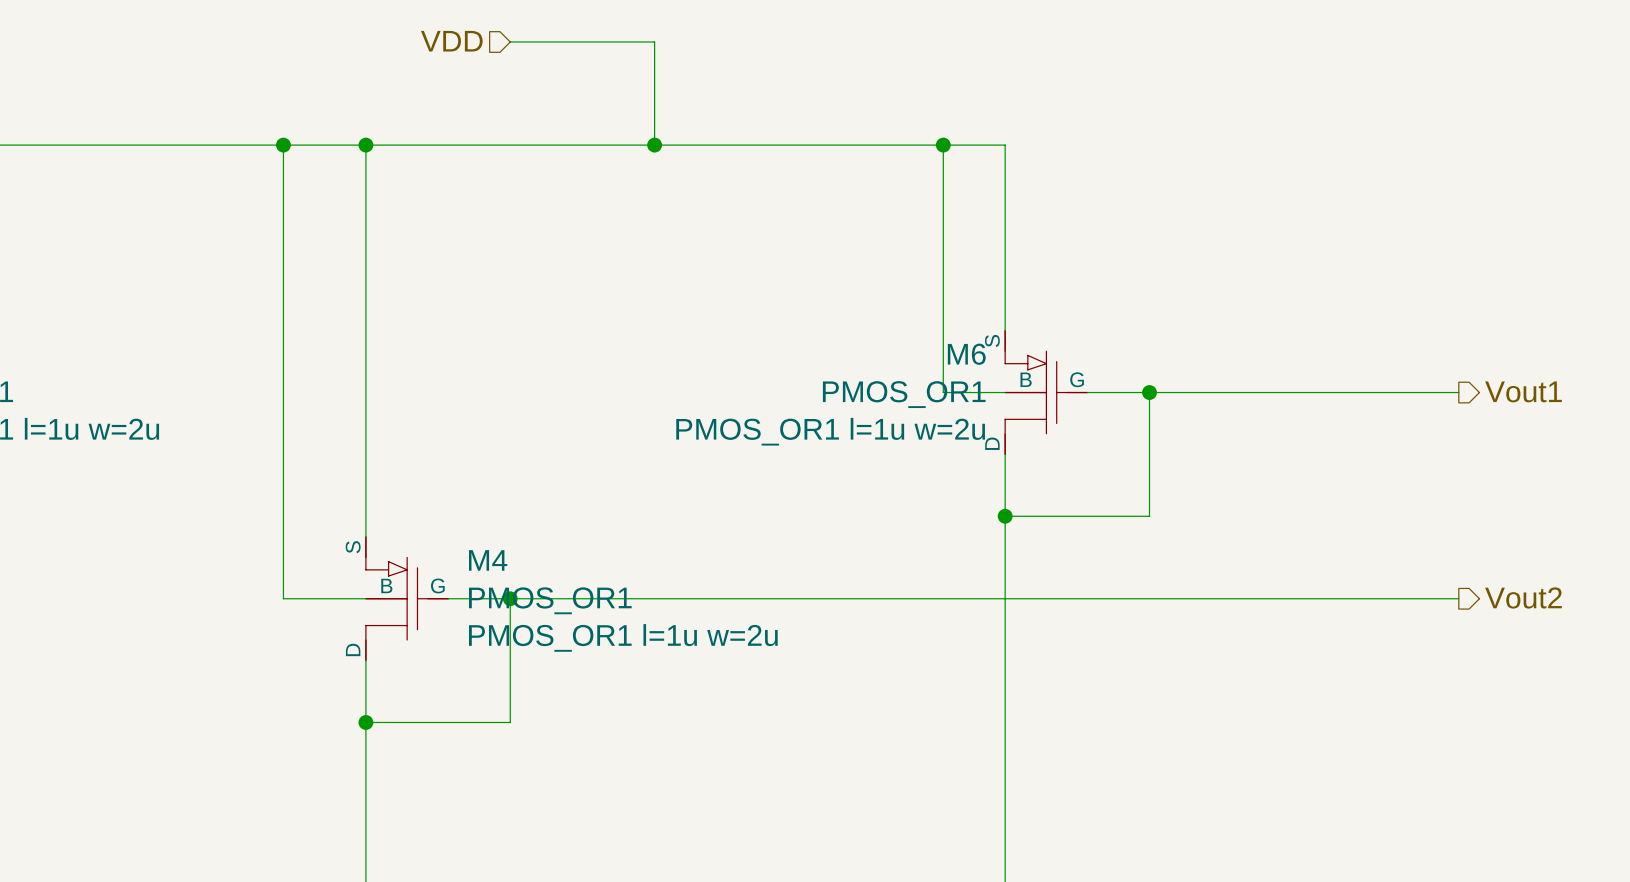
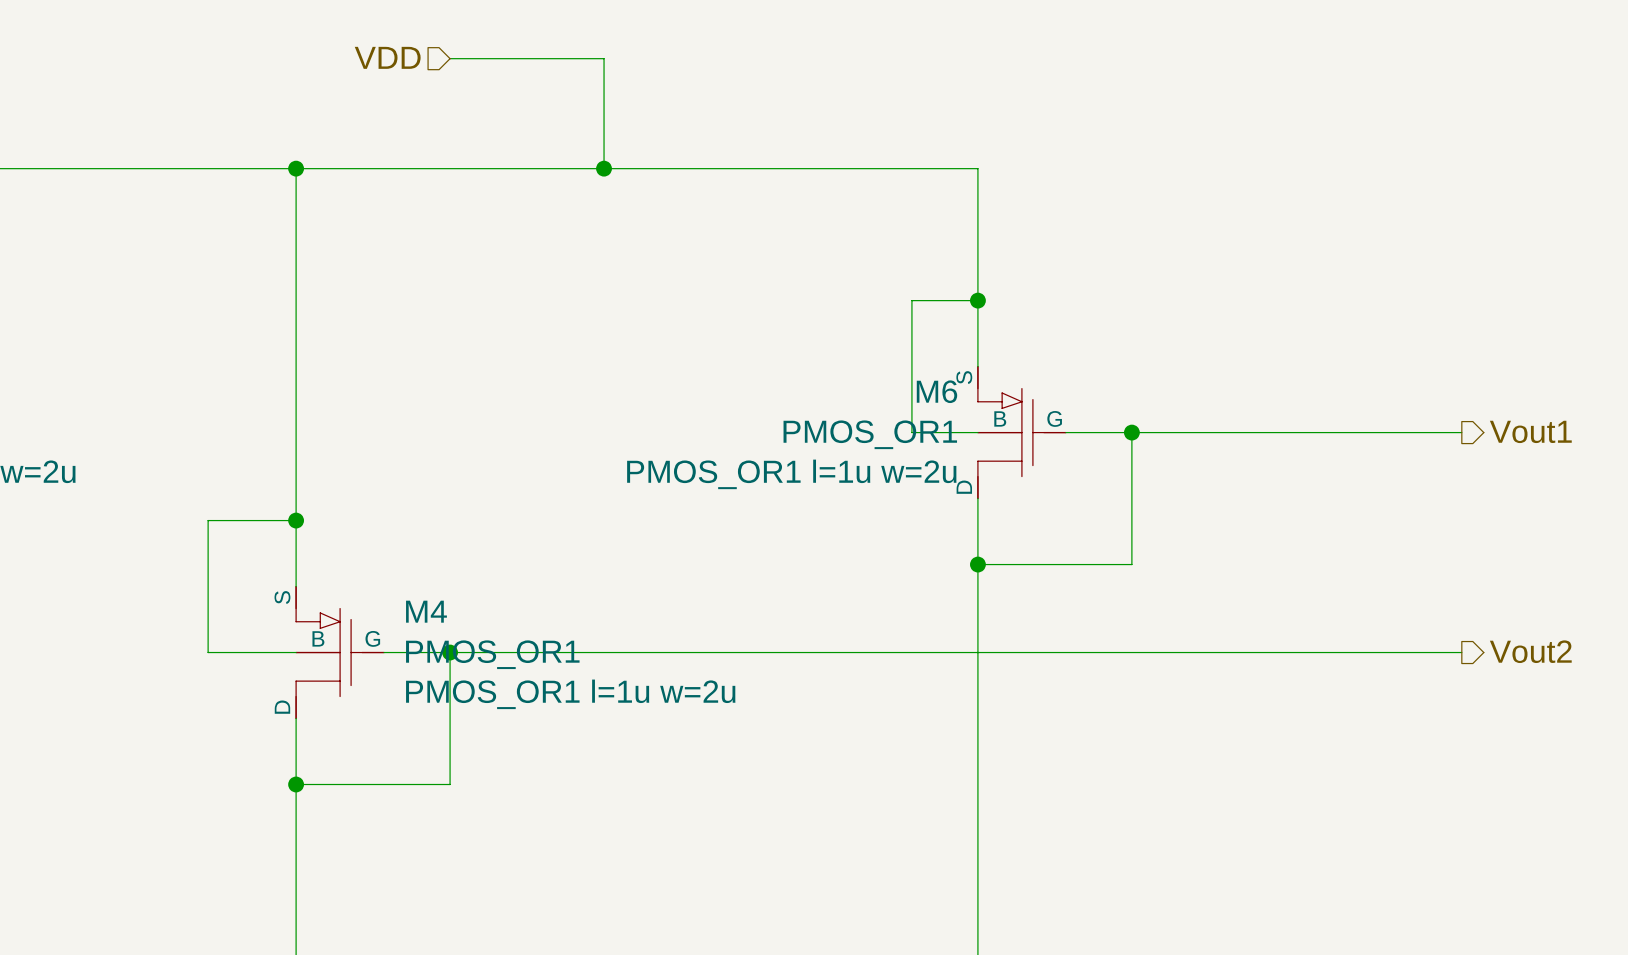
wire: (283, 145) (283, 475) -> (296, 520) (208, 520)
junction: (283, 145) -> none
wire: (943, 145) (943, 268) -> (977, 300) (911, 300)
junction: (943, 145) -> none
junction: none -> (977, 300)
junction: none -> (296, 520)

